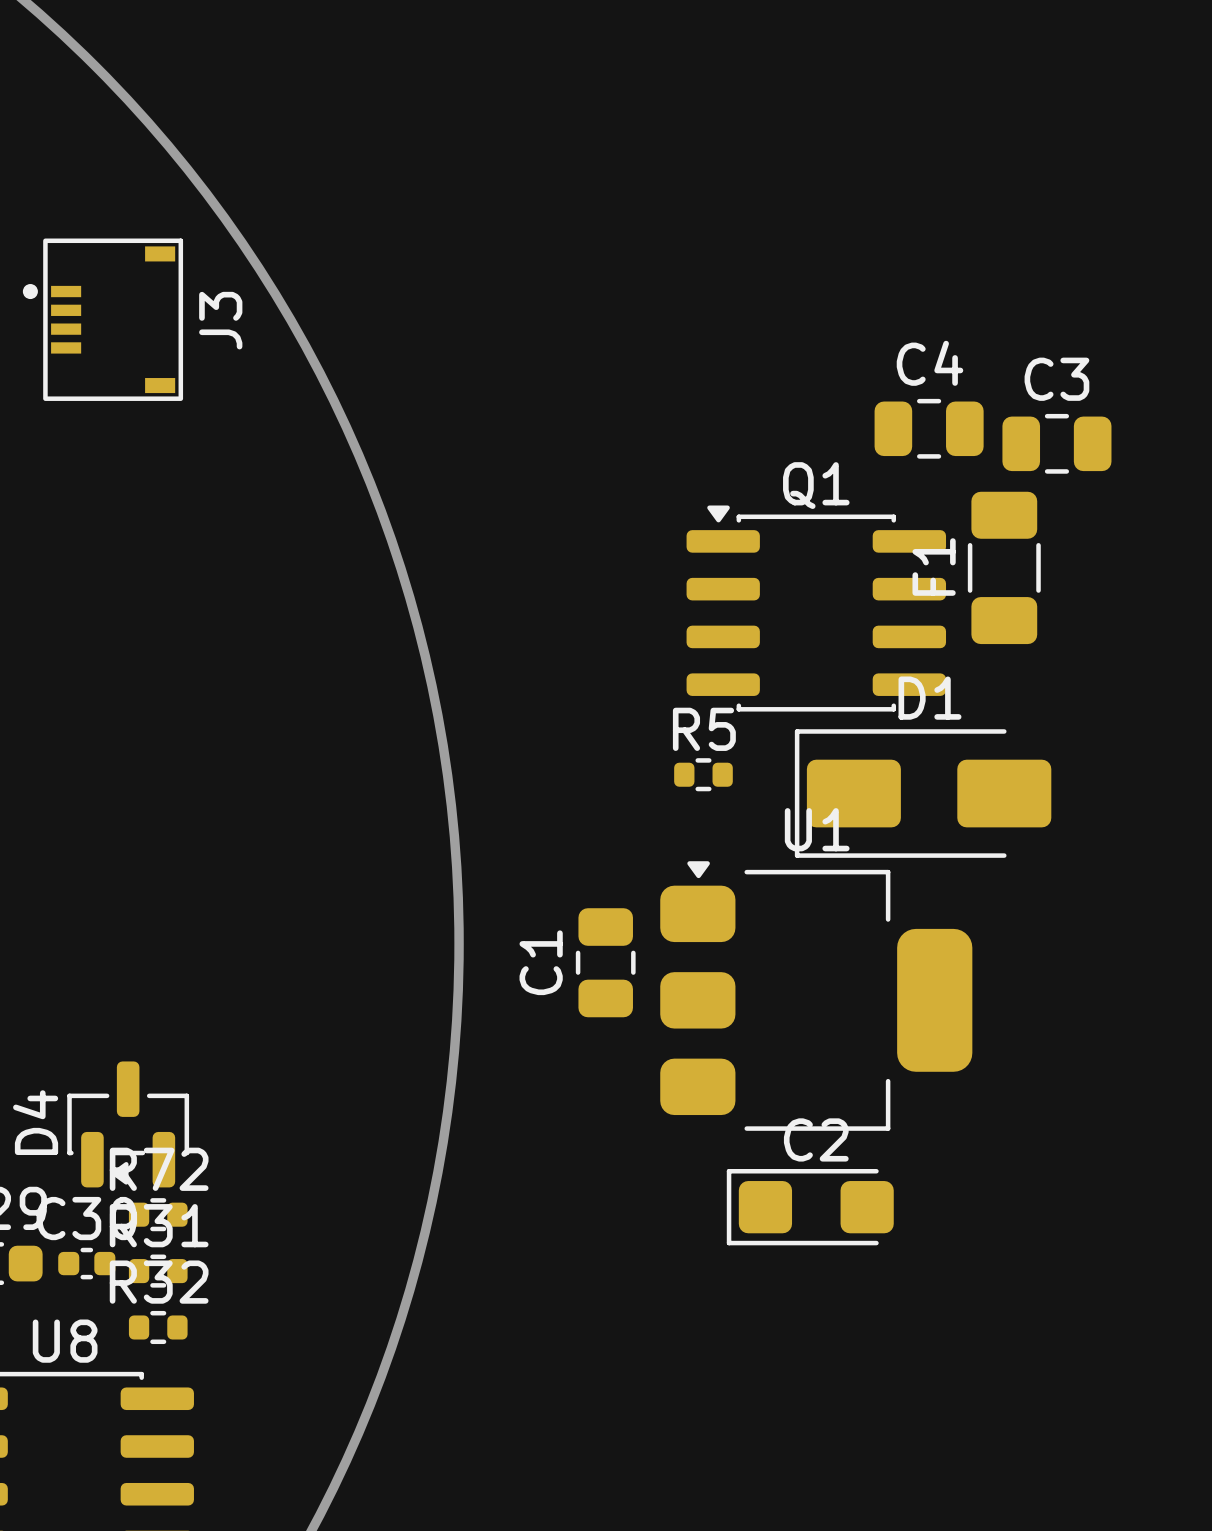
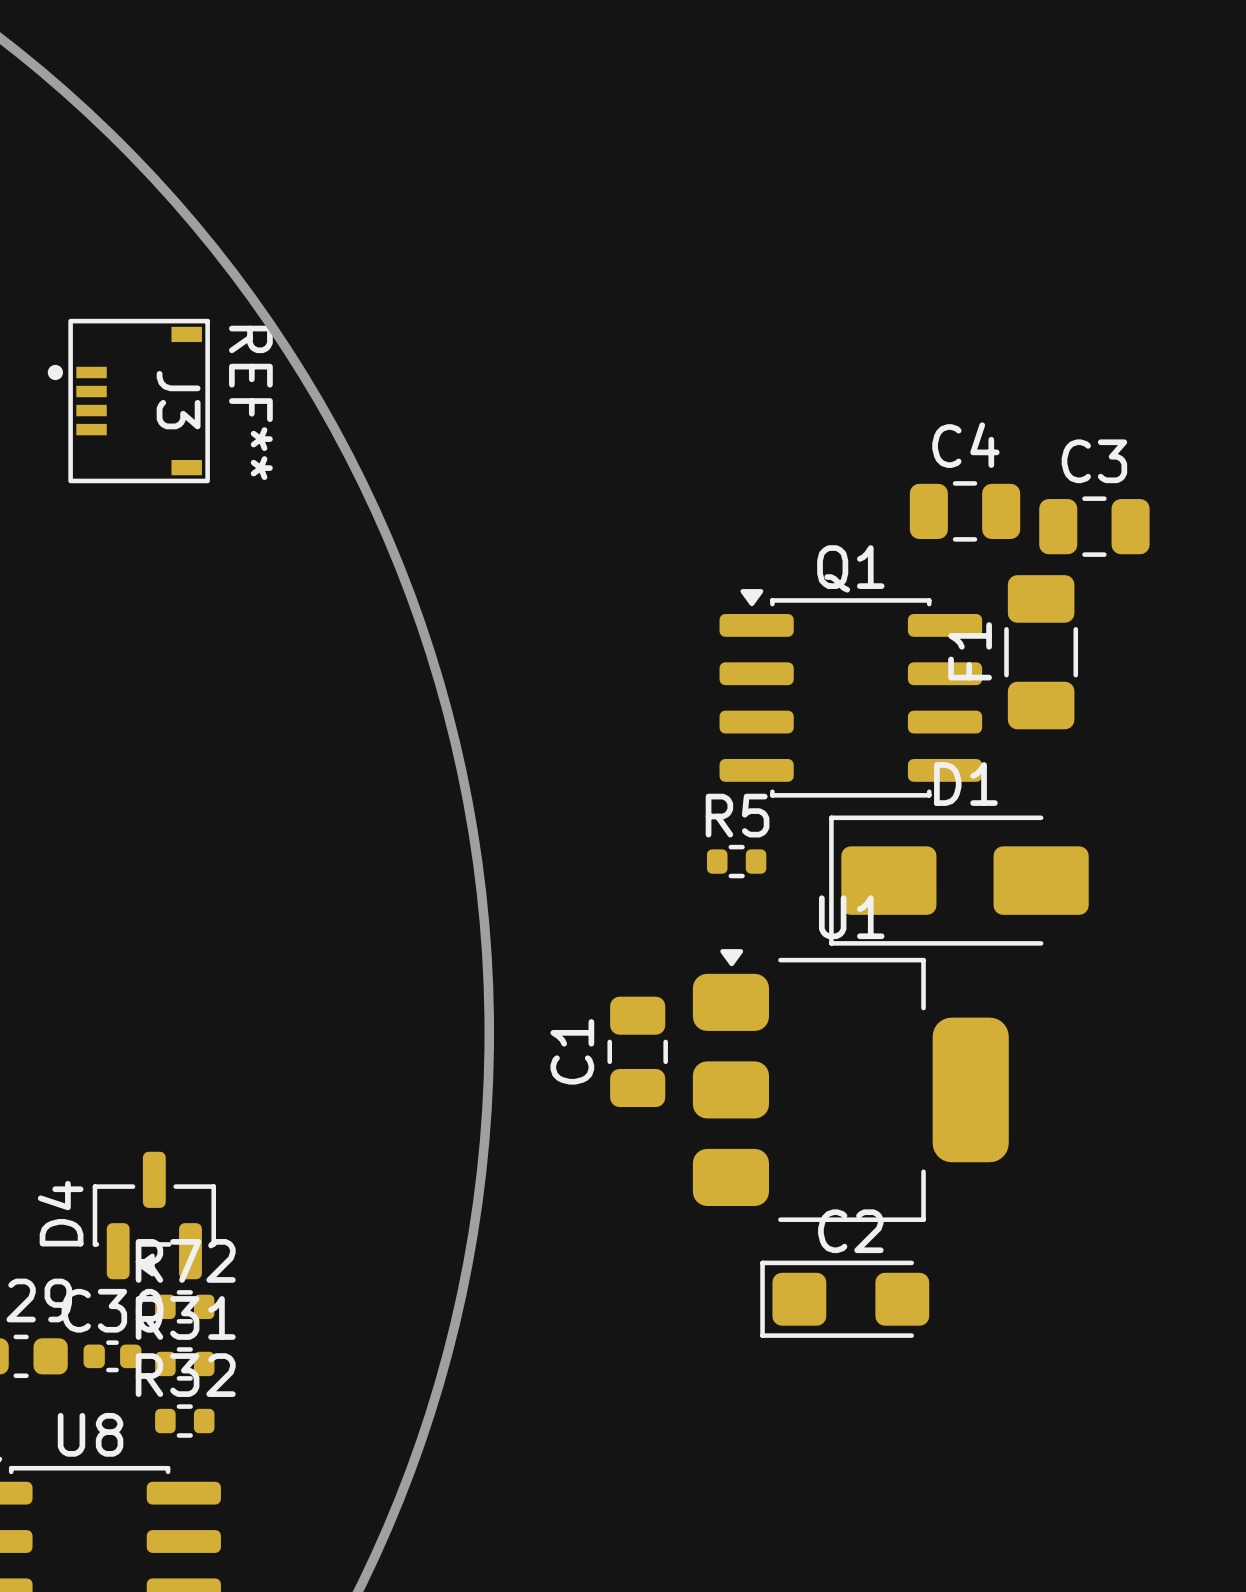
J3 name rotation: 0° (220, 320) -> 180° (178, 400)
J3 text: none -> REF** (250, 402)

